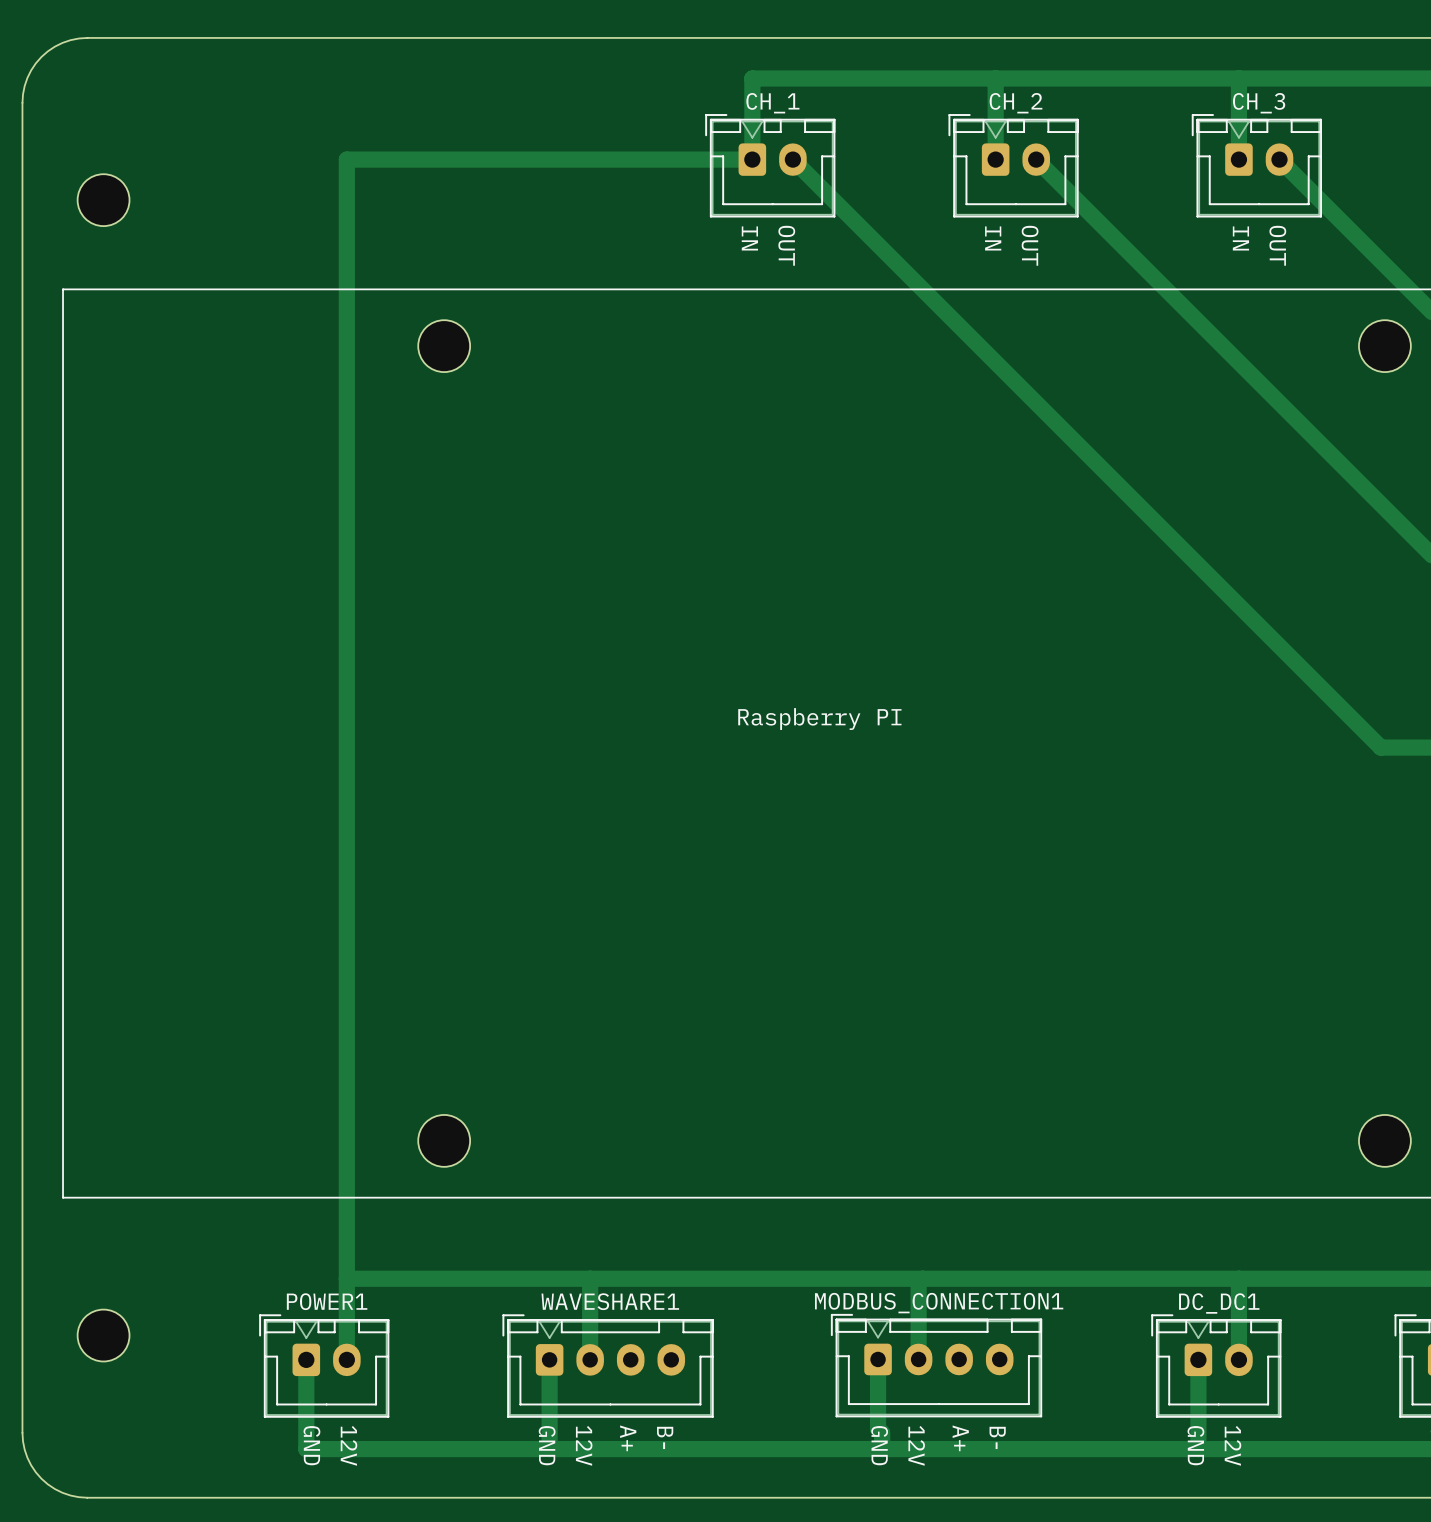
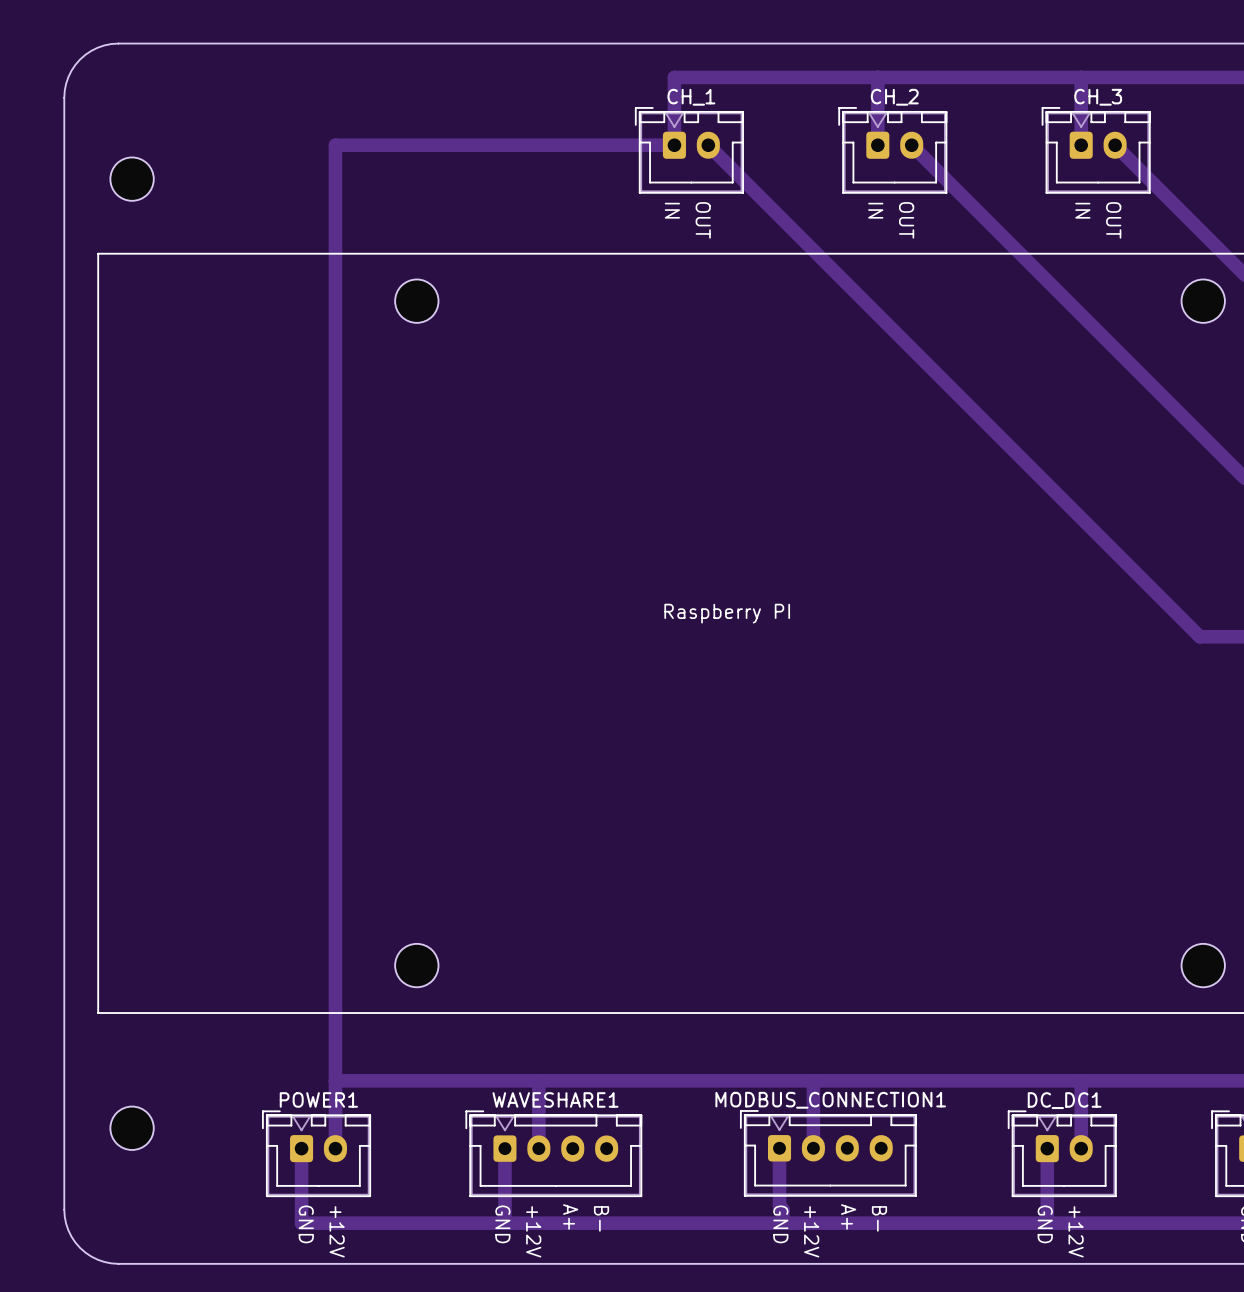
text: 12V (348, 1445) -> +12V (337, 1231)
text: 12V (584, 1445) -> +12V (533, 1231)
text: 12V (916, 1445) -> +12V (811, 1231)
text: 12V (1232, 1445) -> +12V (1076, 1231)

